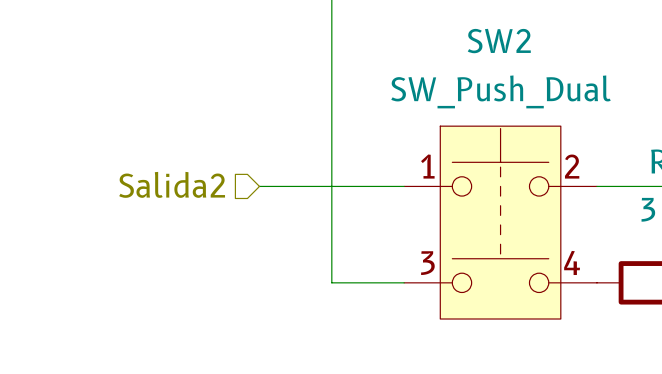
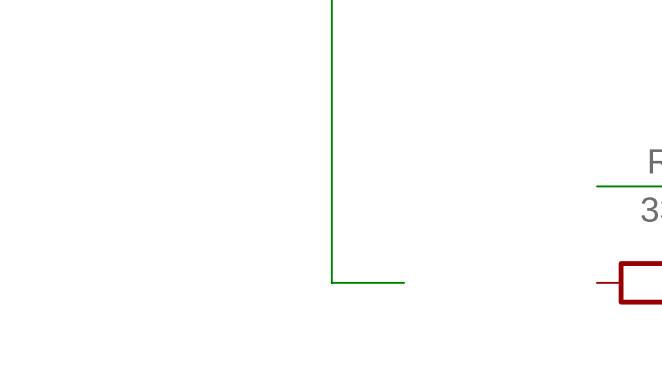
hierarchical label: Salida2 (172, 184) -> none
wire: (259, 186) (404, 186) -> none
SW2: SW_Push_Dual (500, 222) -> none

